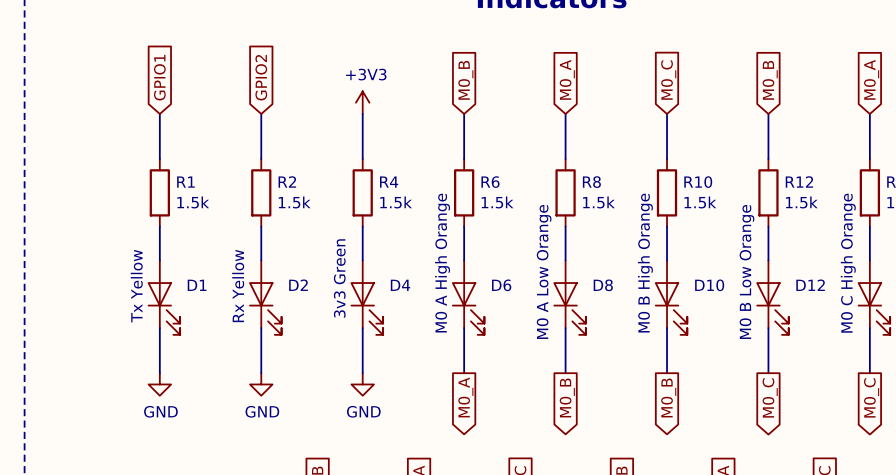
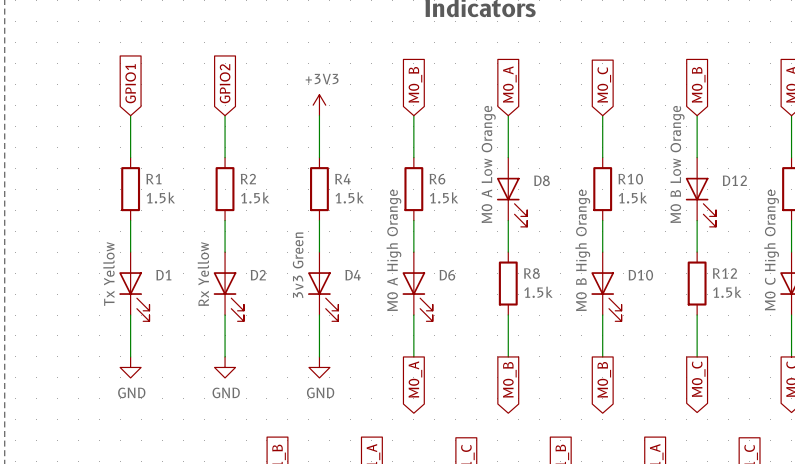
R8 position: (565, 192) -> (508, 283)
R12 position: (768, 192) -> (697, 283)
D8 position: (569, 297) -> (512, 192)
D12 position: (772, 297) -> (700, 192)

